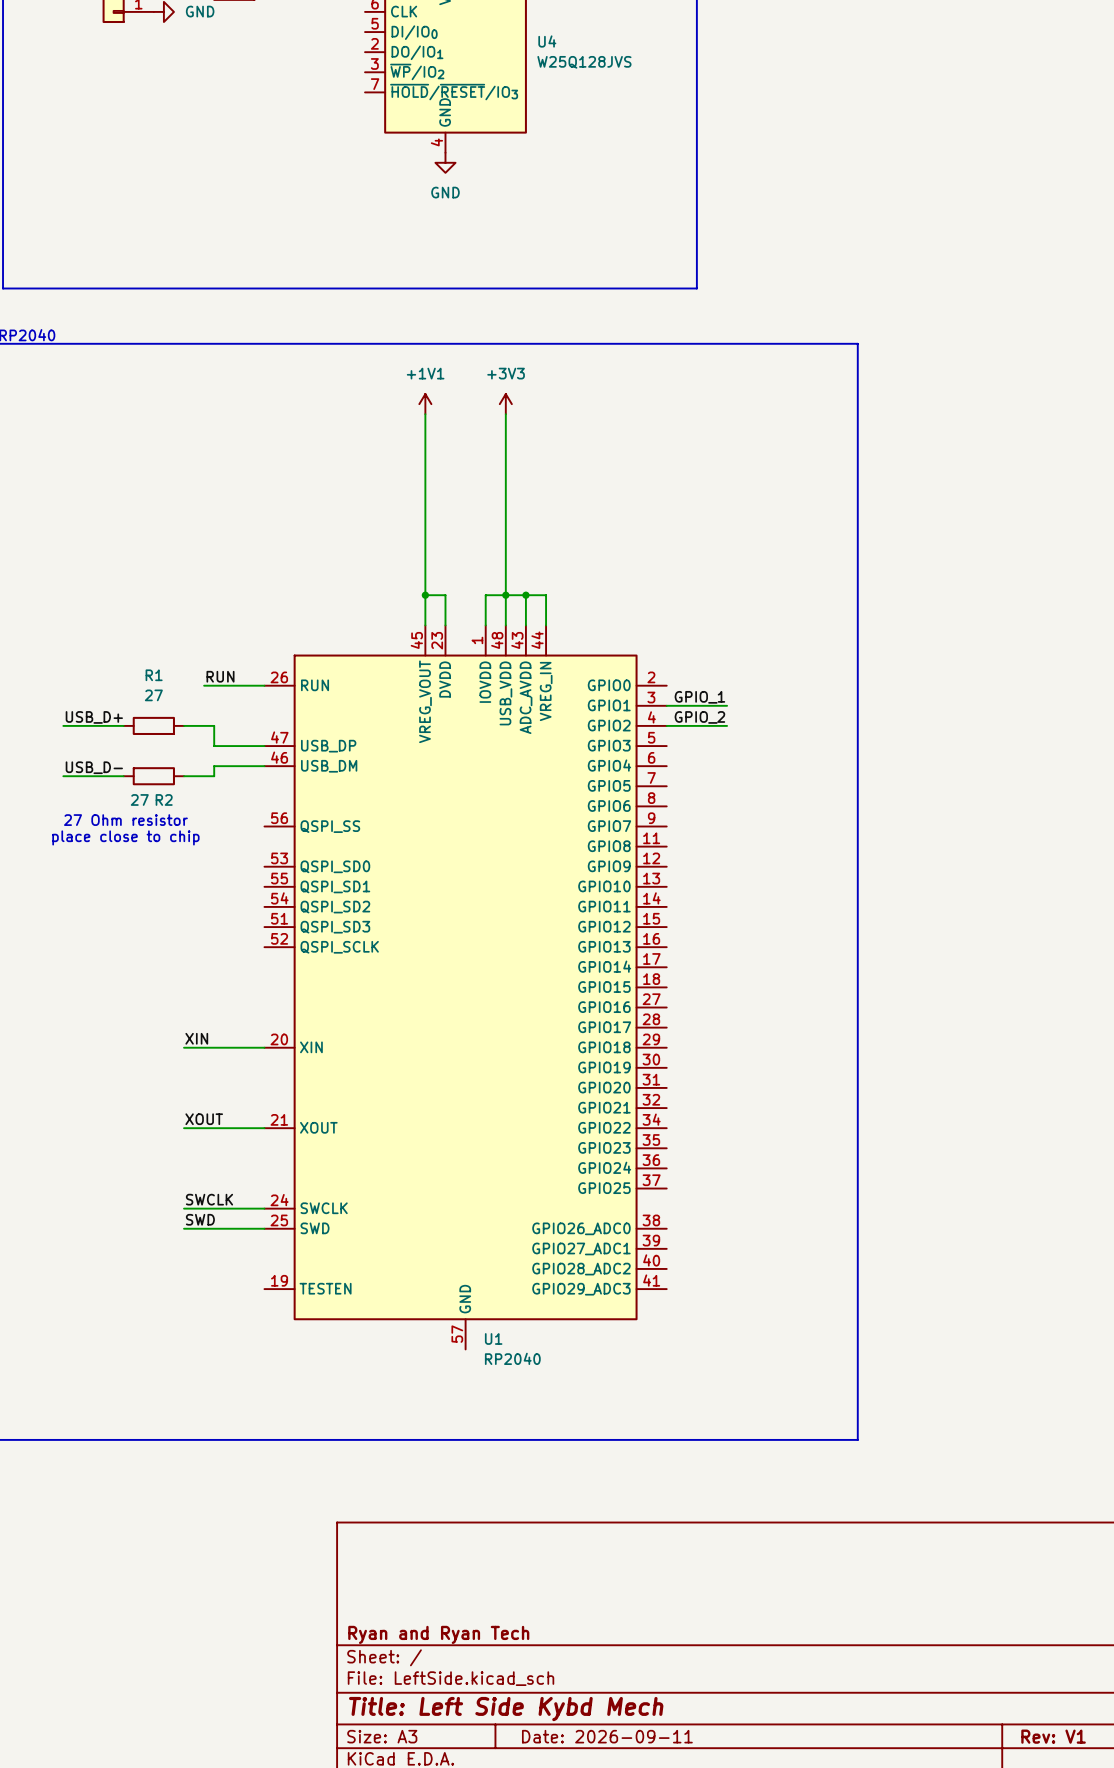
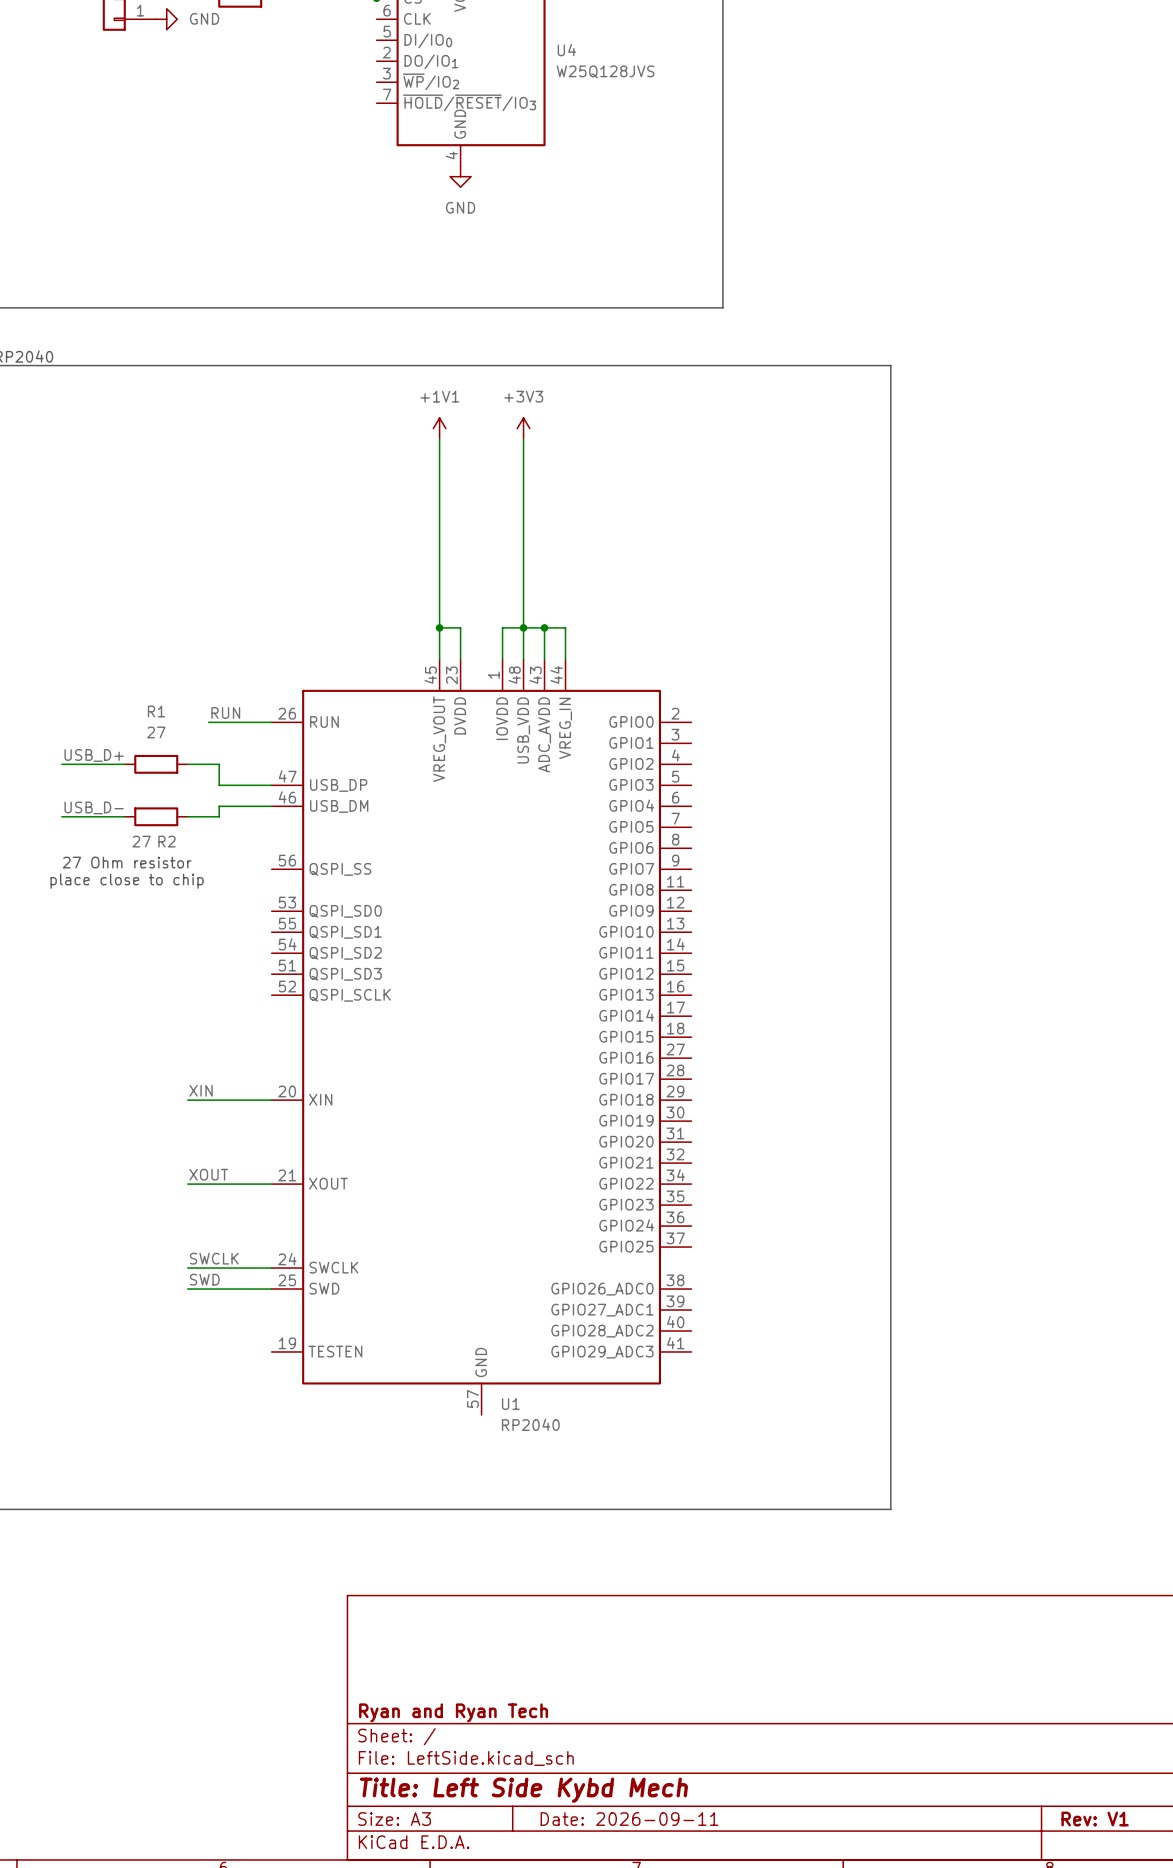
label: GPIO_1 (699, 697) -> none
wire: (666, 705) (727, 705) -> none
label: GPIO_2 (699, 717) -> none
wire: (666, 725) (727, 725) -> none

